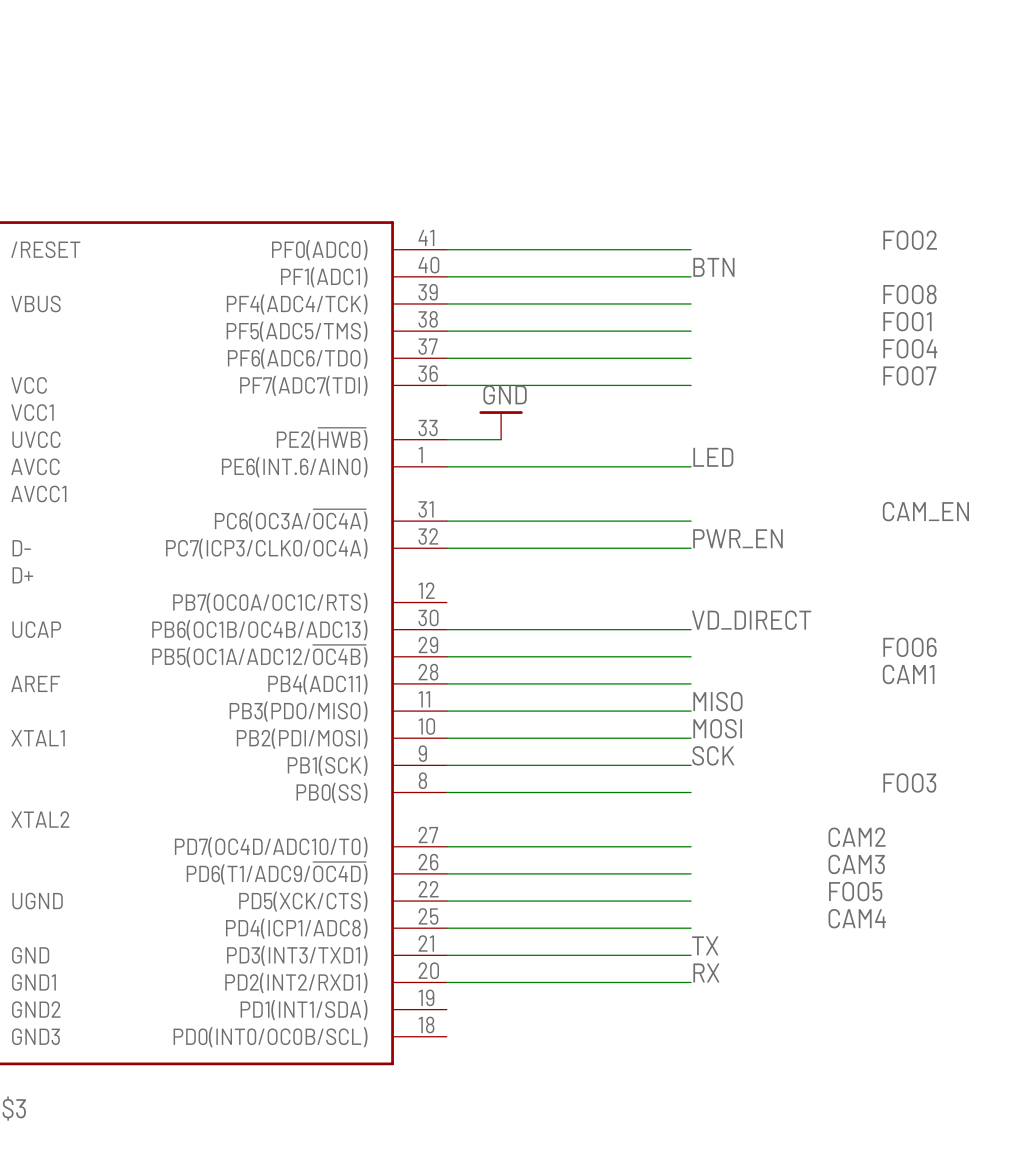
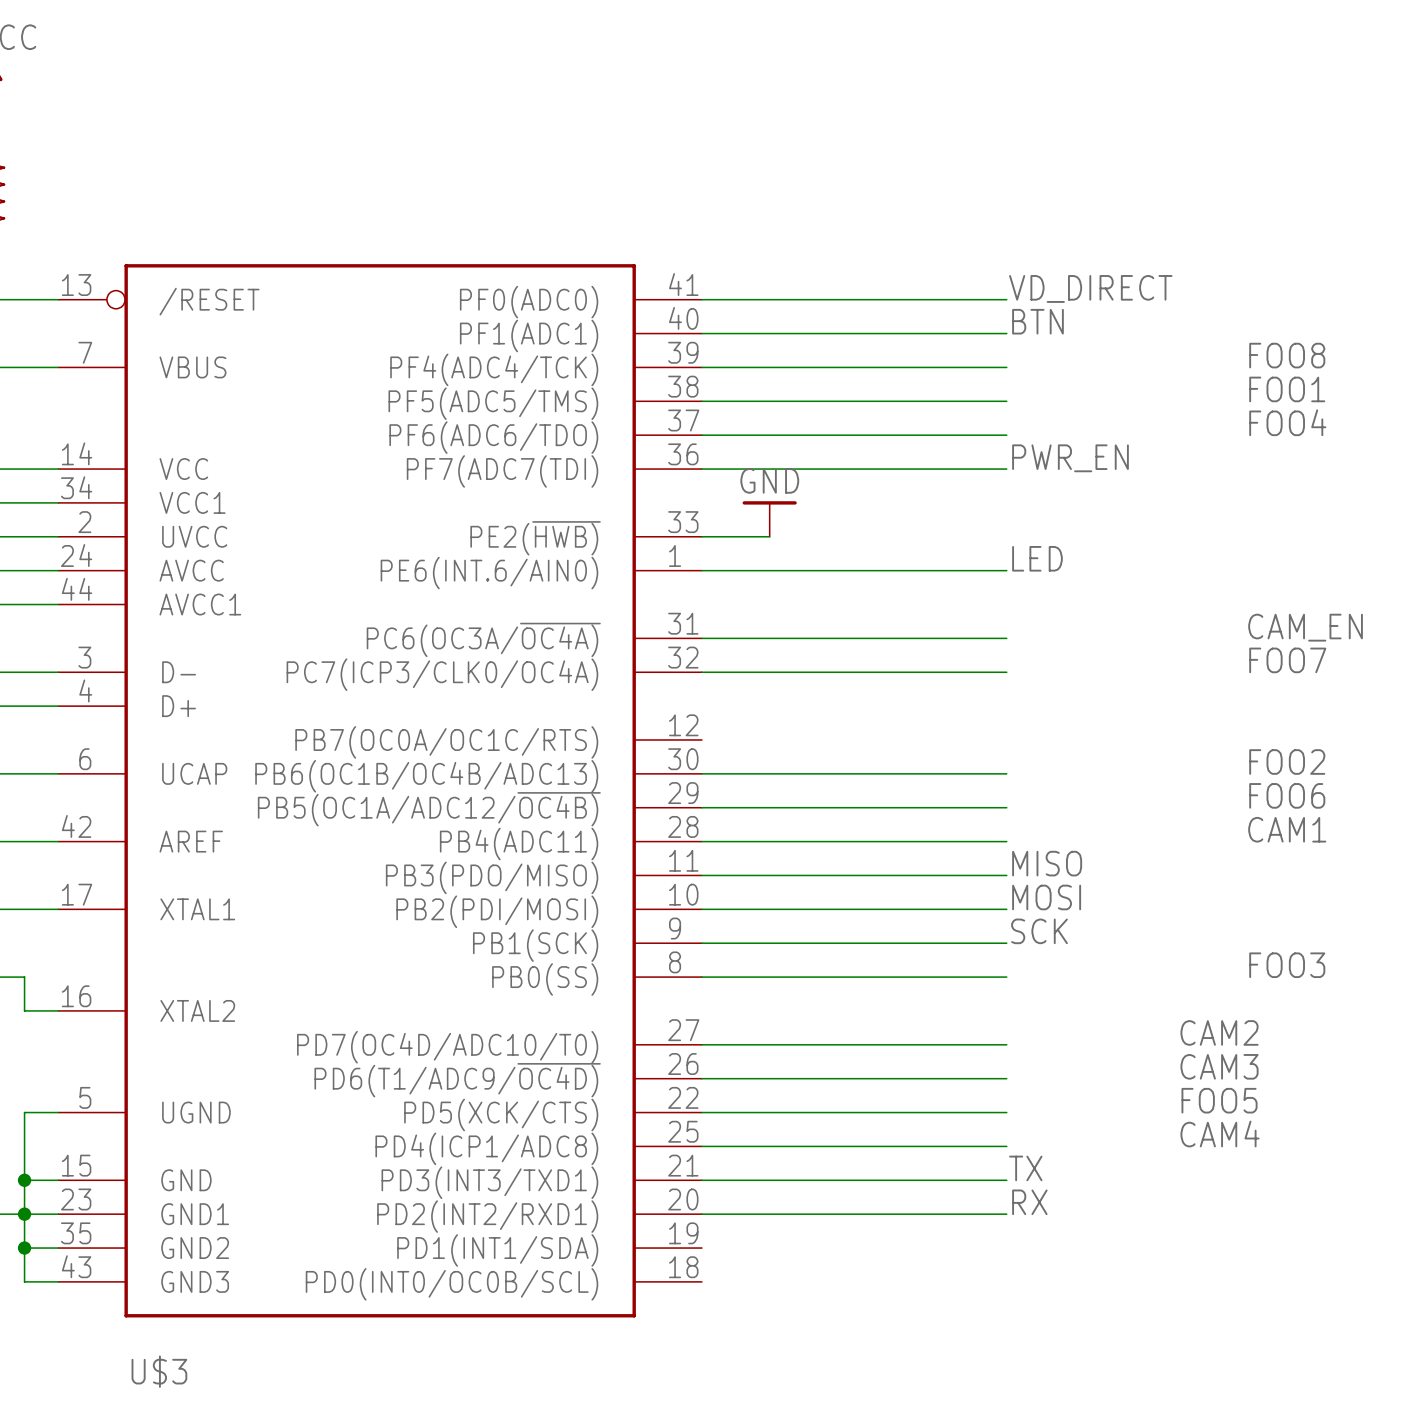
label: none -> VD_DIRECT (1090, 288)
label: FOO2 (910, 240) -> none
label position: FOO7 (909, 375) -> FOO7 (1287, 660)
label position: PWR_EN (737, 538) -> PWR_EN (1070, 458)
label: VD_DIRECT (751, 620) -> none
label: none -> FOO2 (1287, 762)

